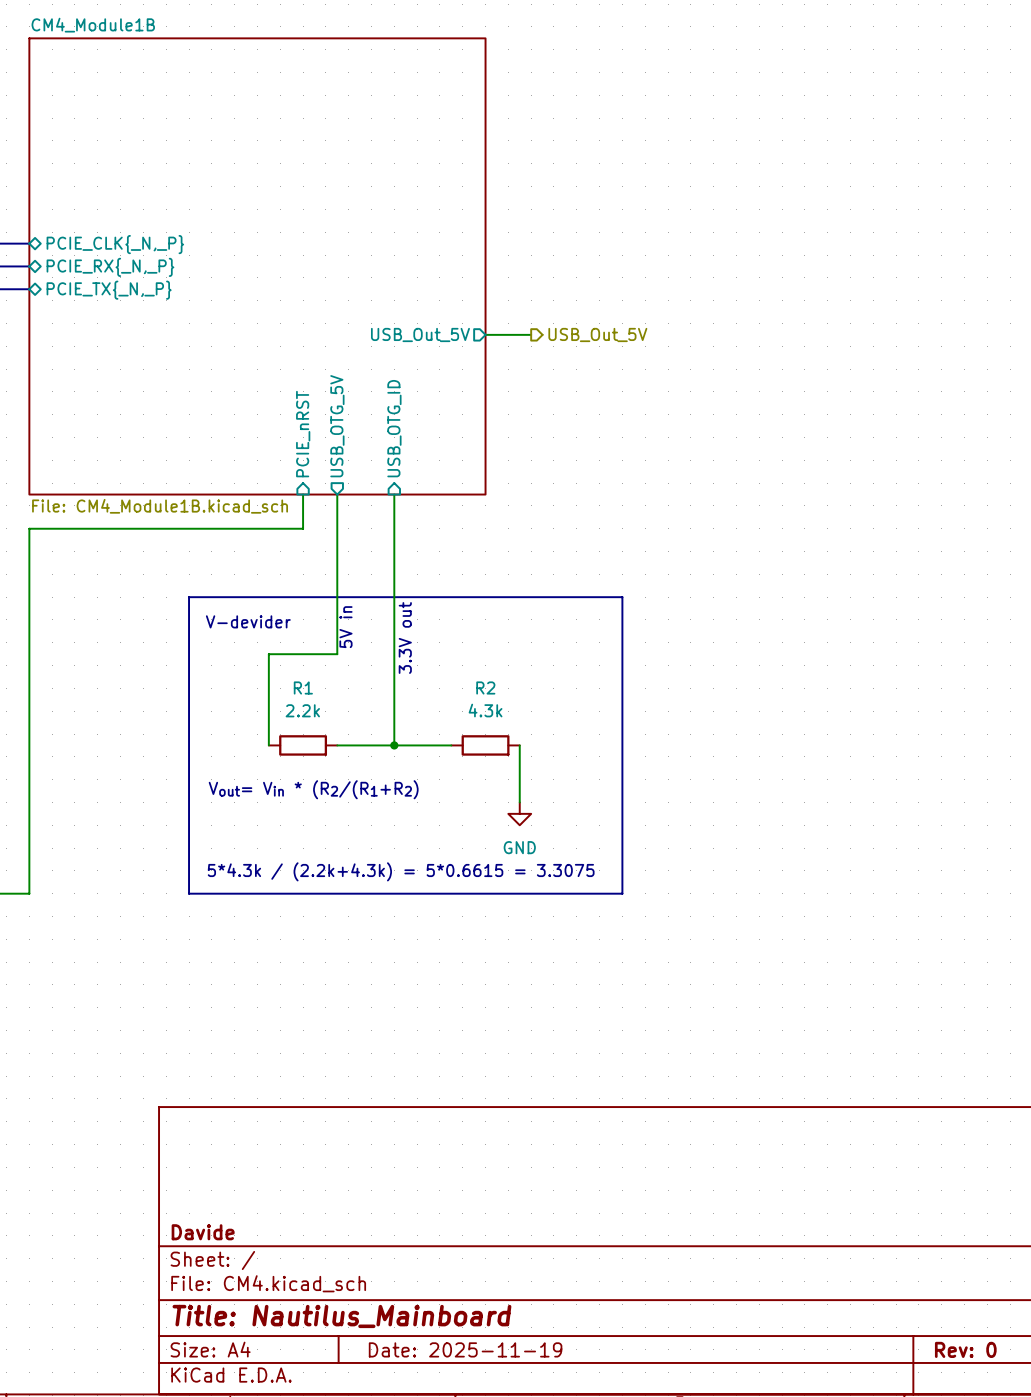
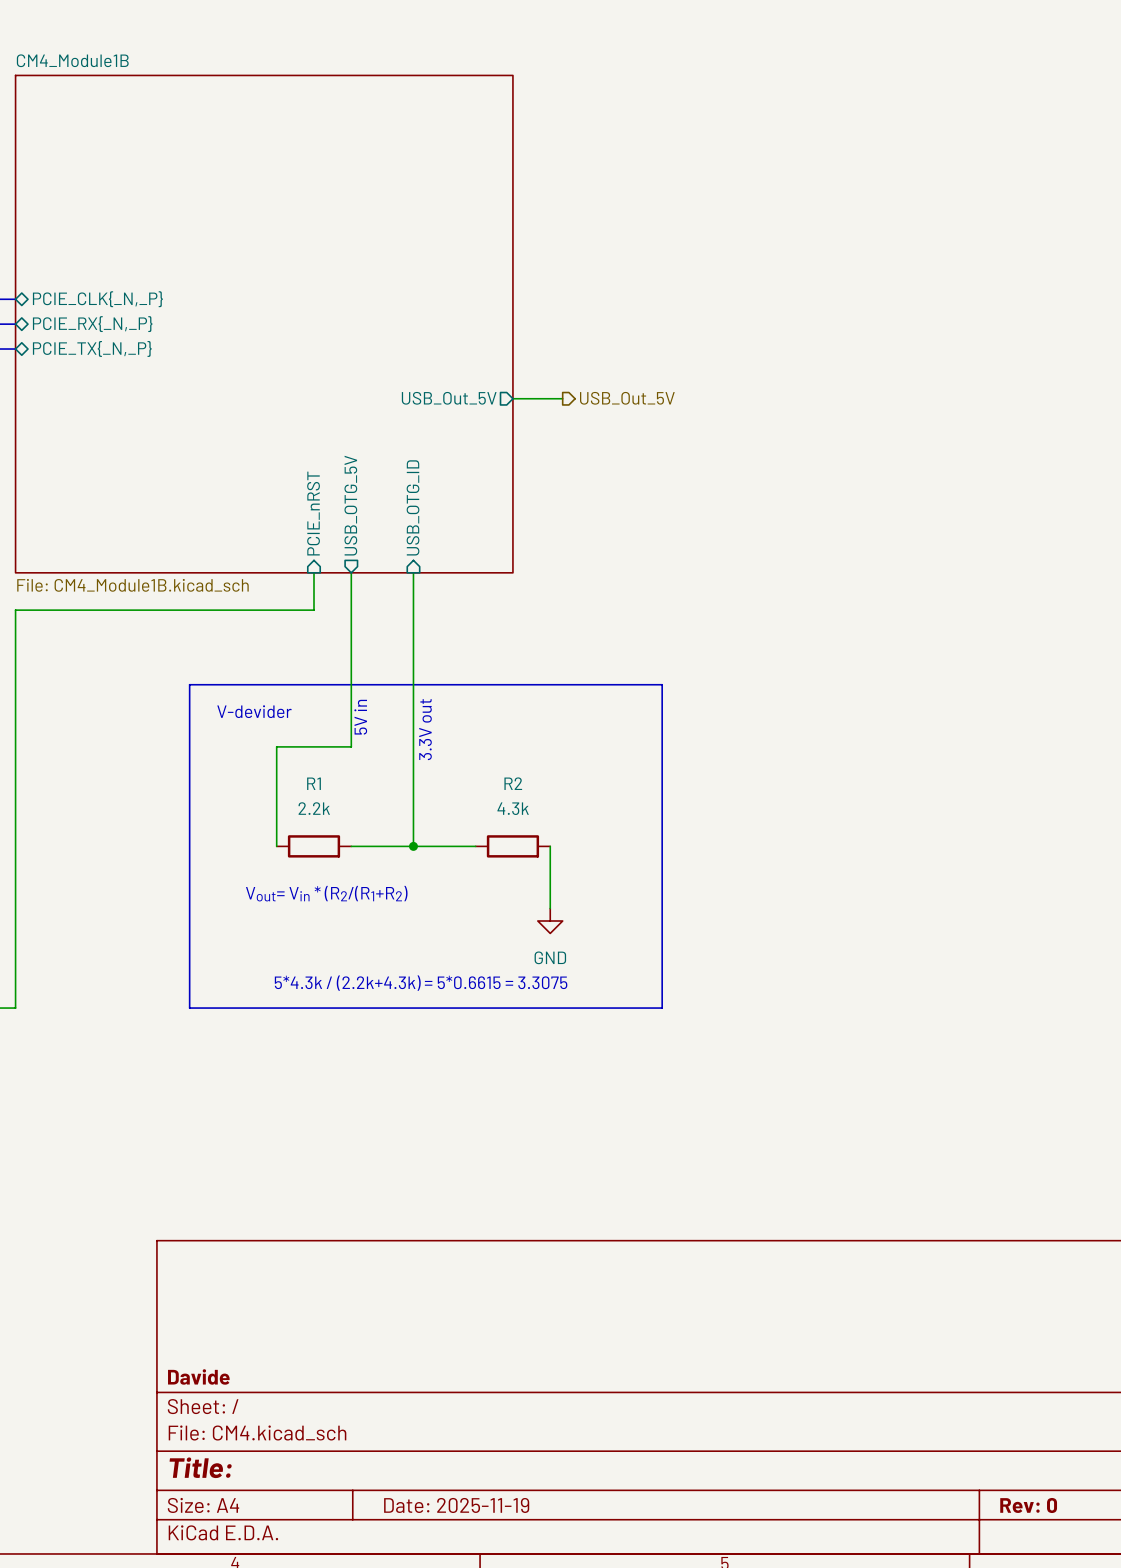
title block: Title: Nautilus_Mainboard (341, 1316) -> Title: (200, 1467)

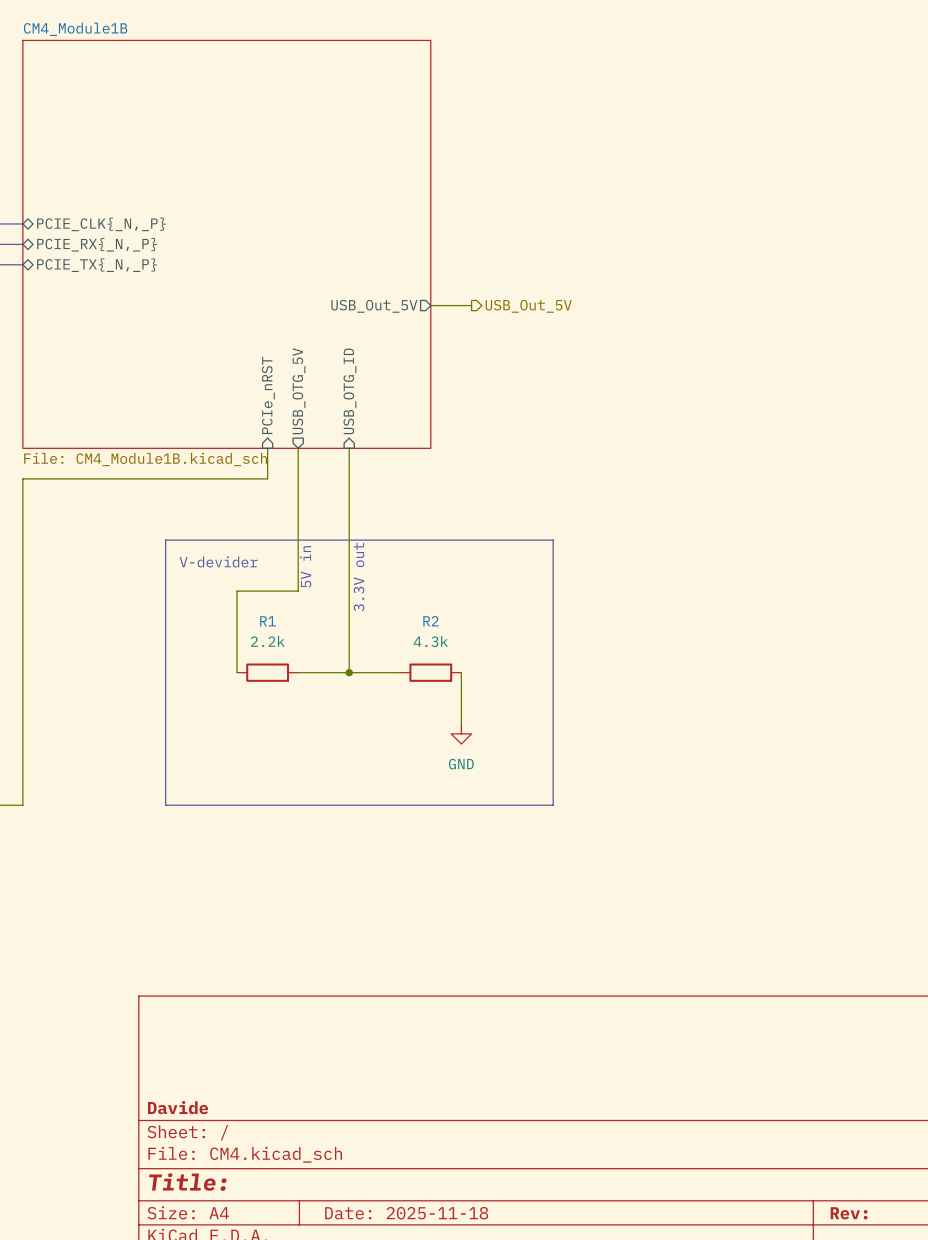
sheet pin: PCIE_nRST (313, 513) -> PCIe_nRST (268, 395)
text: Vout= Vin * (R2/(R1+R2) (326, 893) -> none
text: 5*4.3k / (2.2k+4.3k) = 5*0.6615 = 3.3075 (421, 983) -> none
title block: Date: 2025-11-19 (456, 1505) -> Date: 2025-11-18 (406, 1213)
title block: Rev: 0 (1028, 1505) -> Rev: (849, 1213)

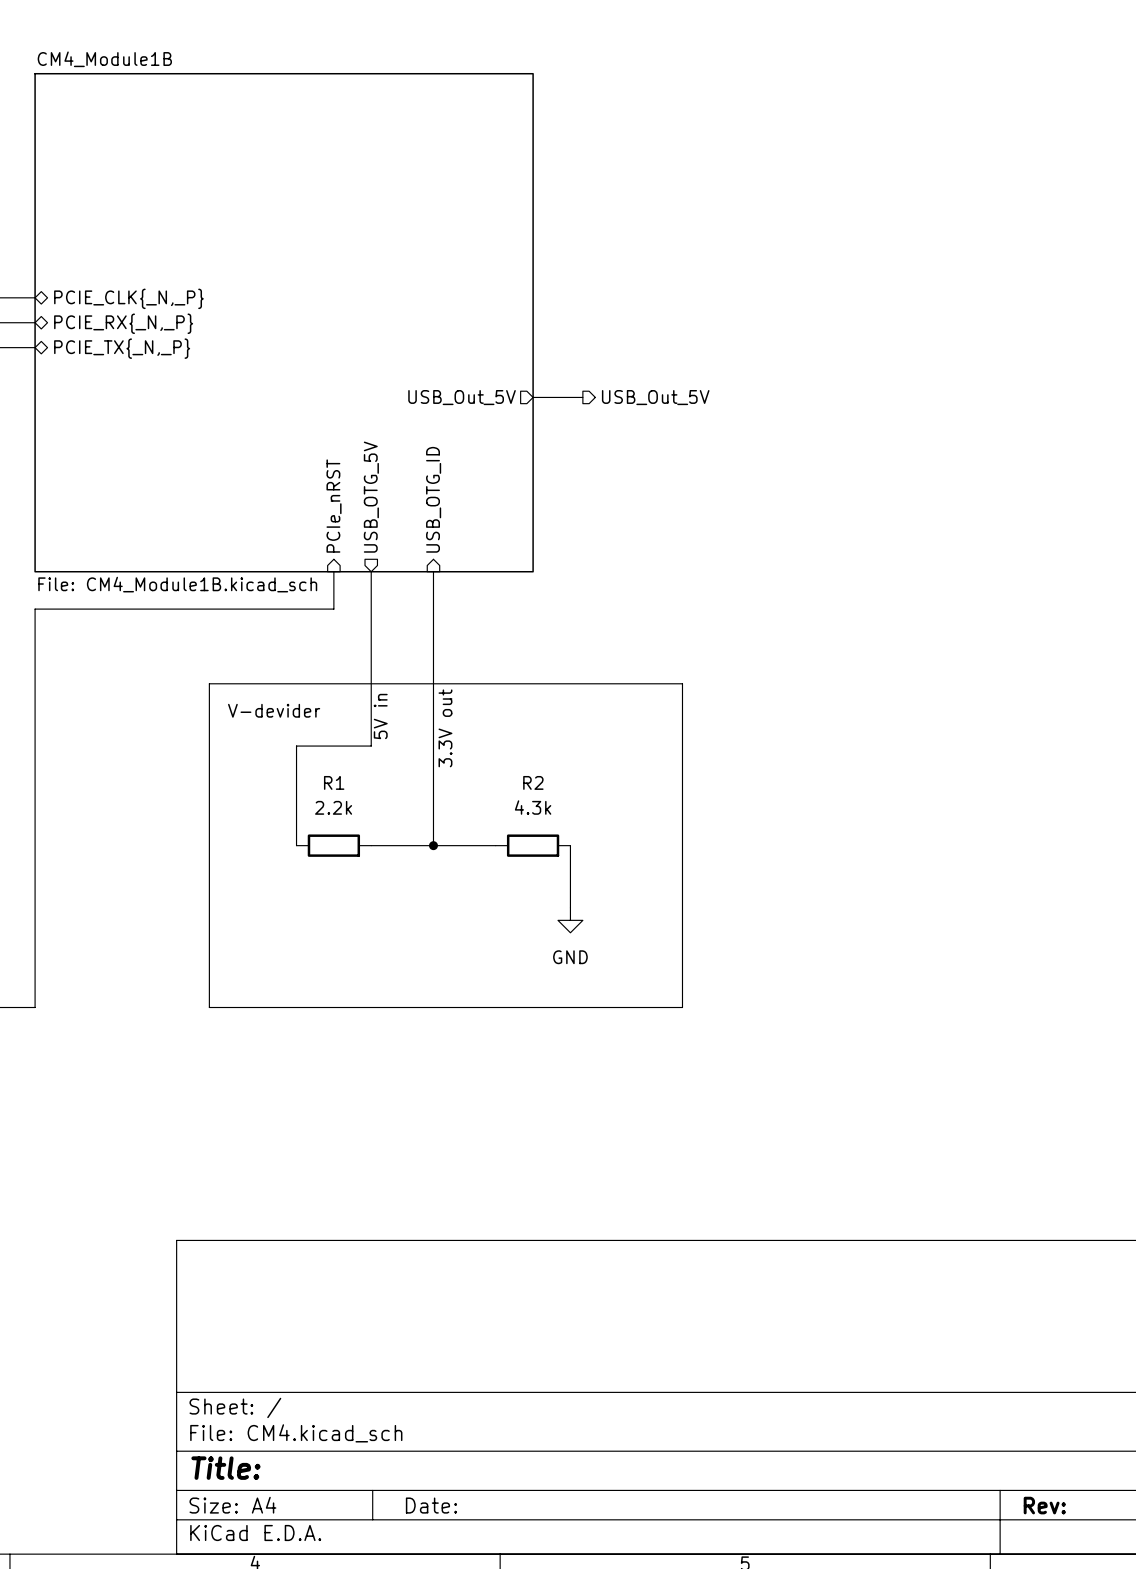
title block: Davide (178, 1107) -> none
title block: Date: 2025-11-18 (406, 1213) -> Date: (431, 1505)

